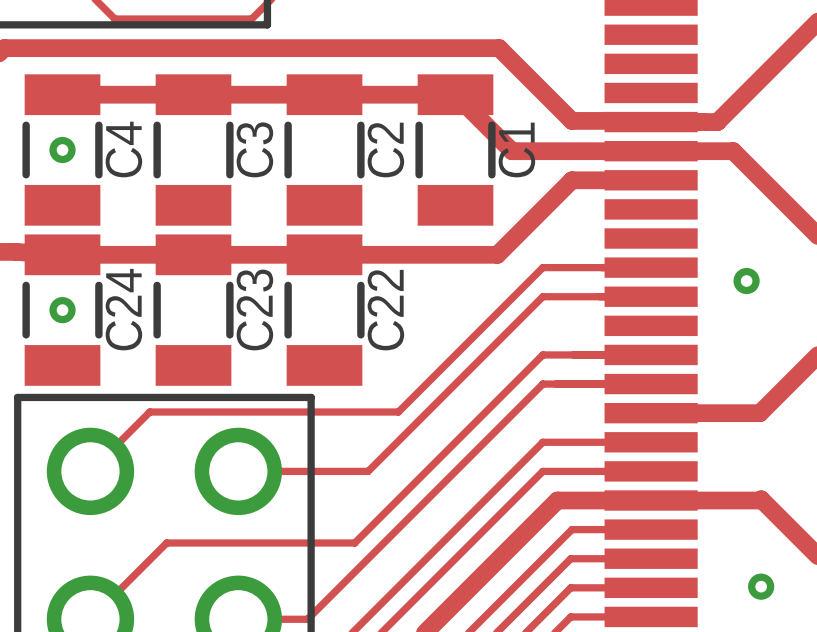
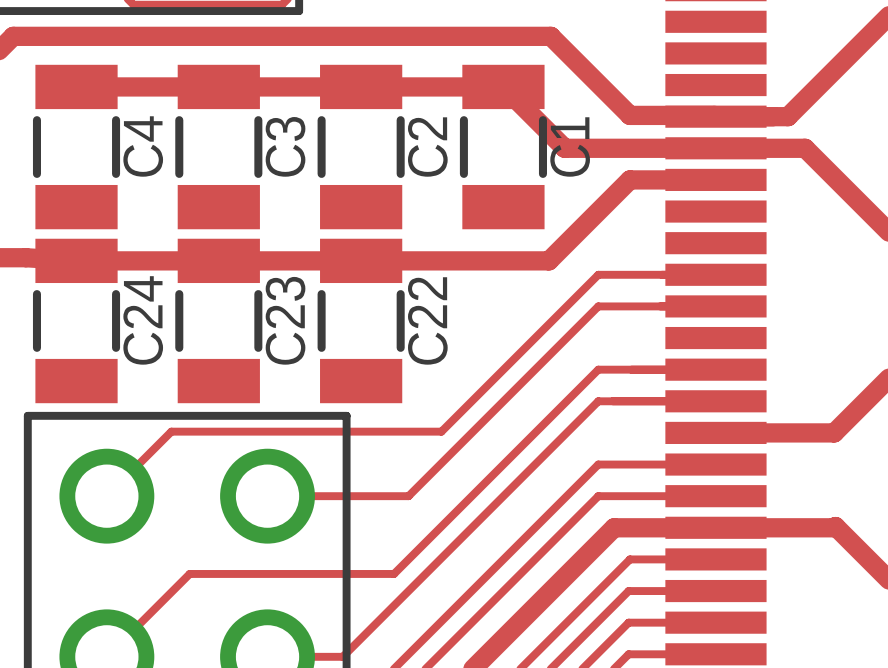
via: (62, 150) -> none
via: (746, 281) -> none
via: (62, 310) -> none
via: (761, 586) -> none

